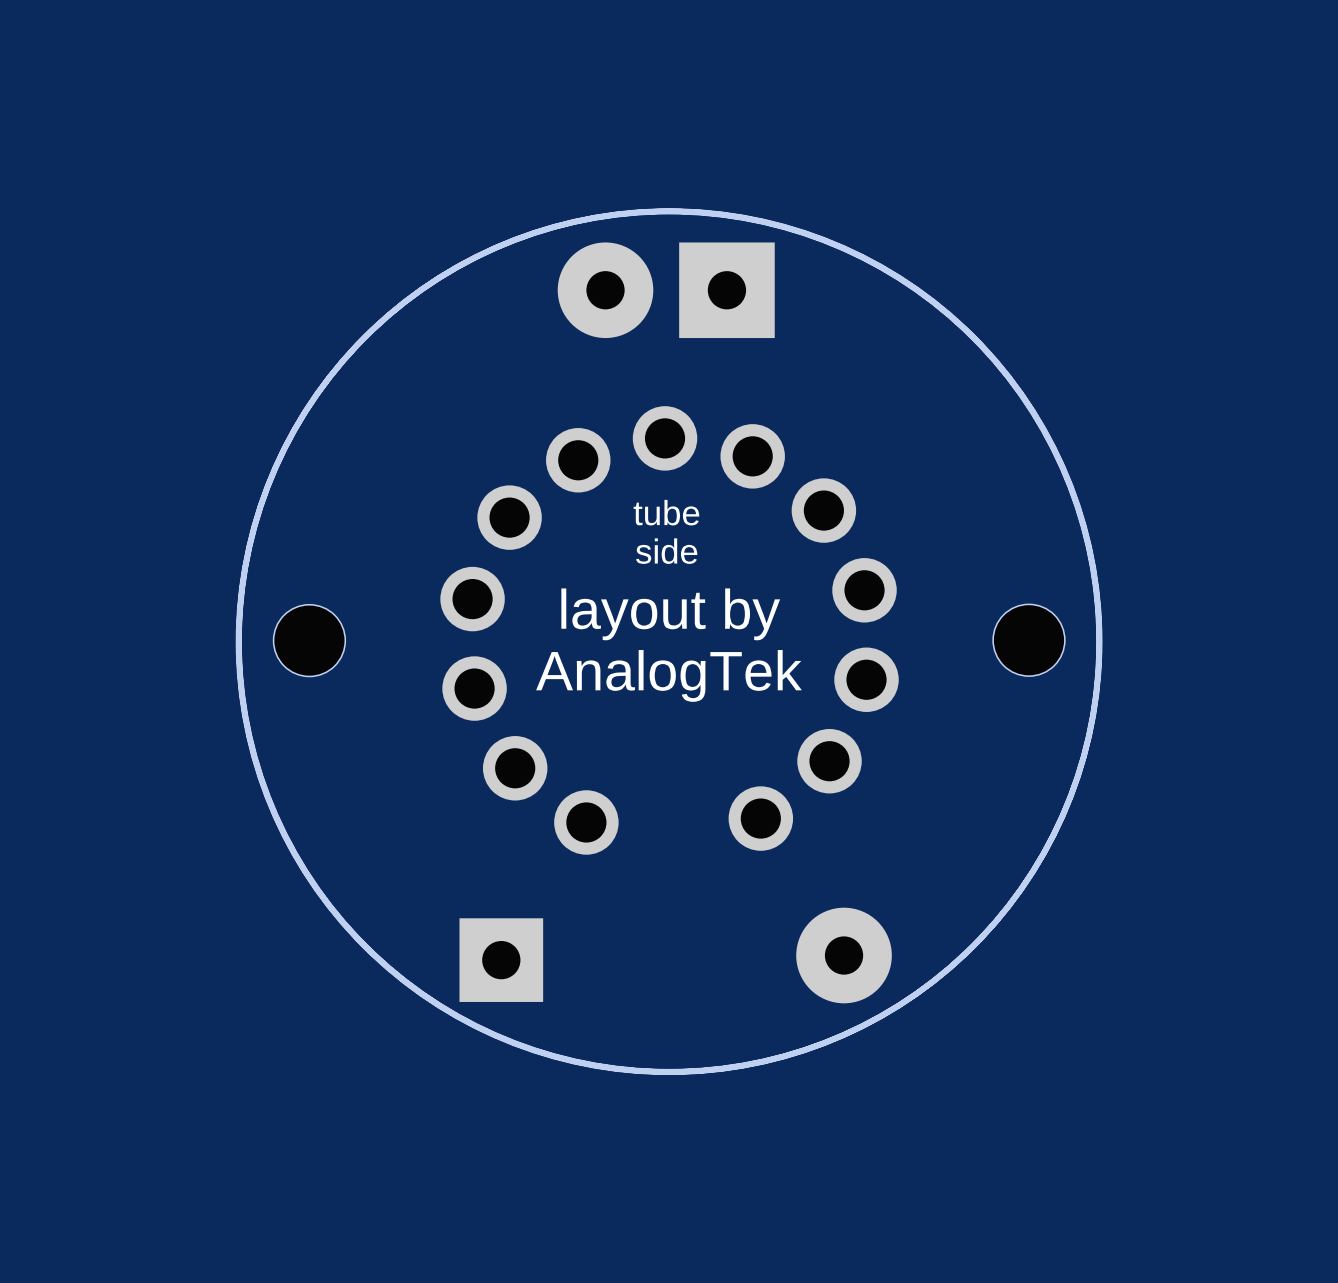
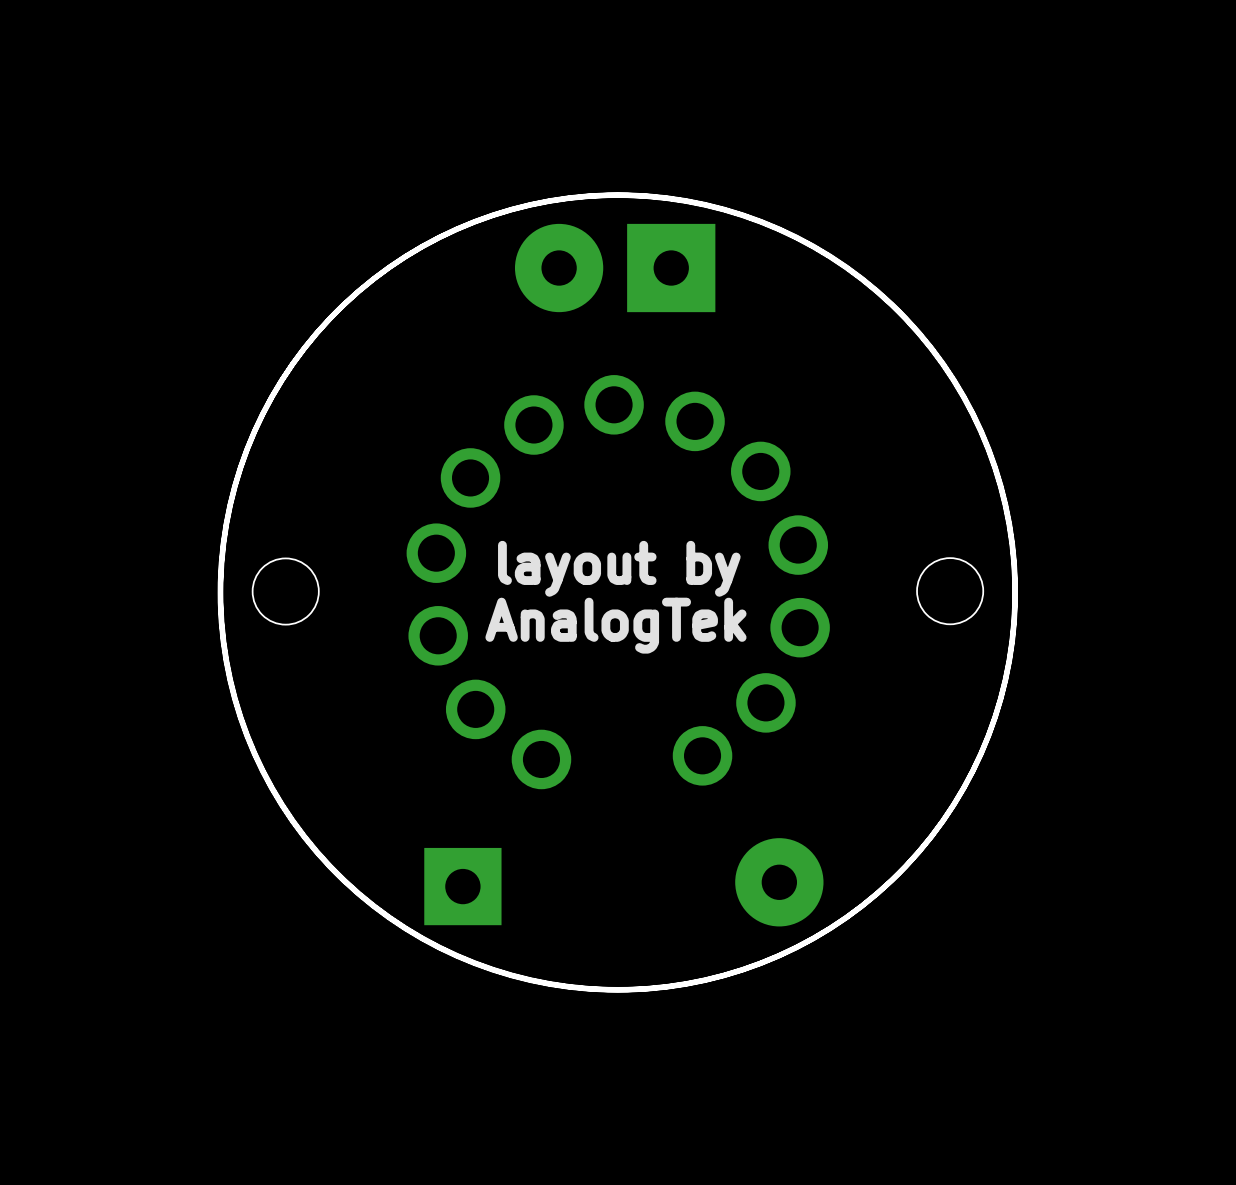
text: tube (666, 512) -> none
text: side (666, 551) -> none

